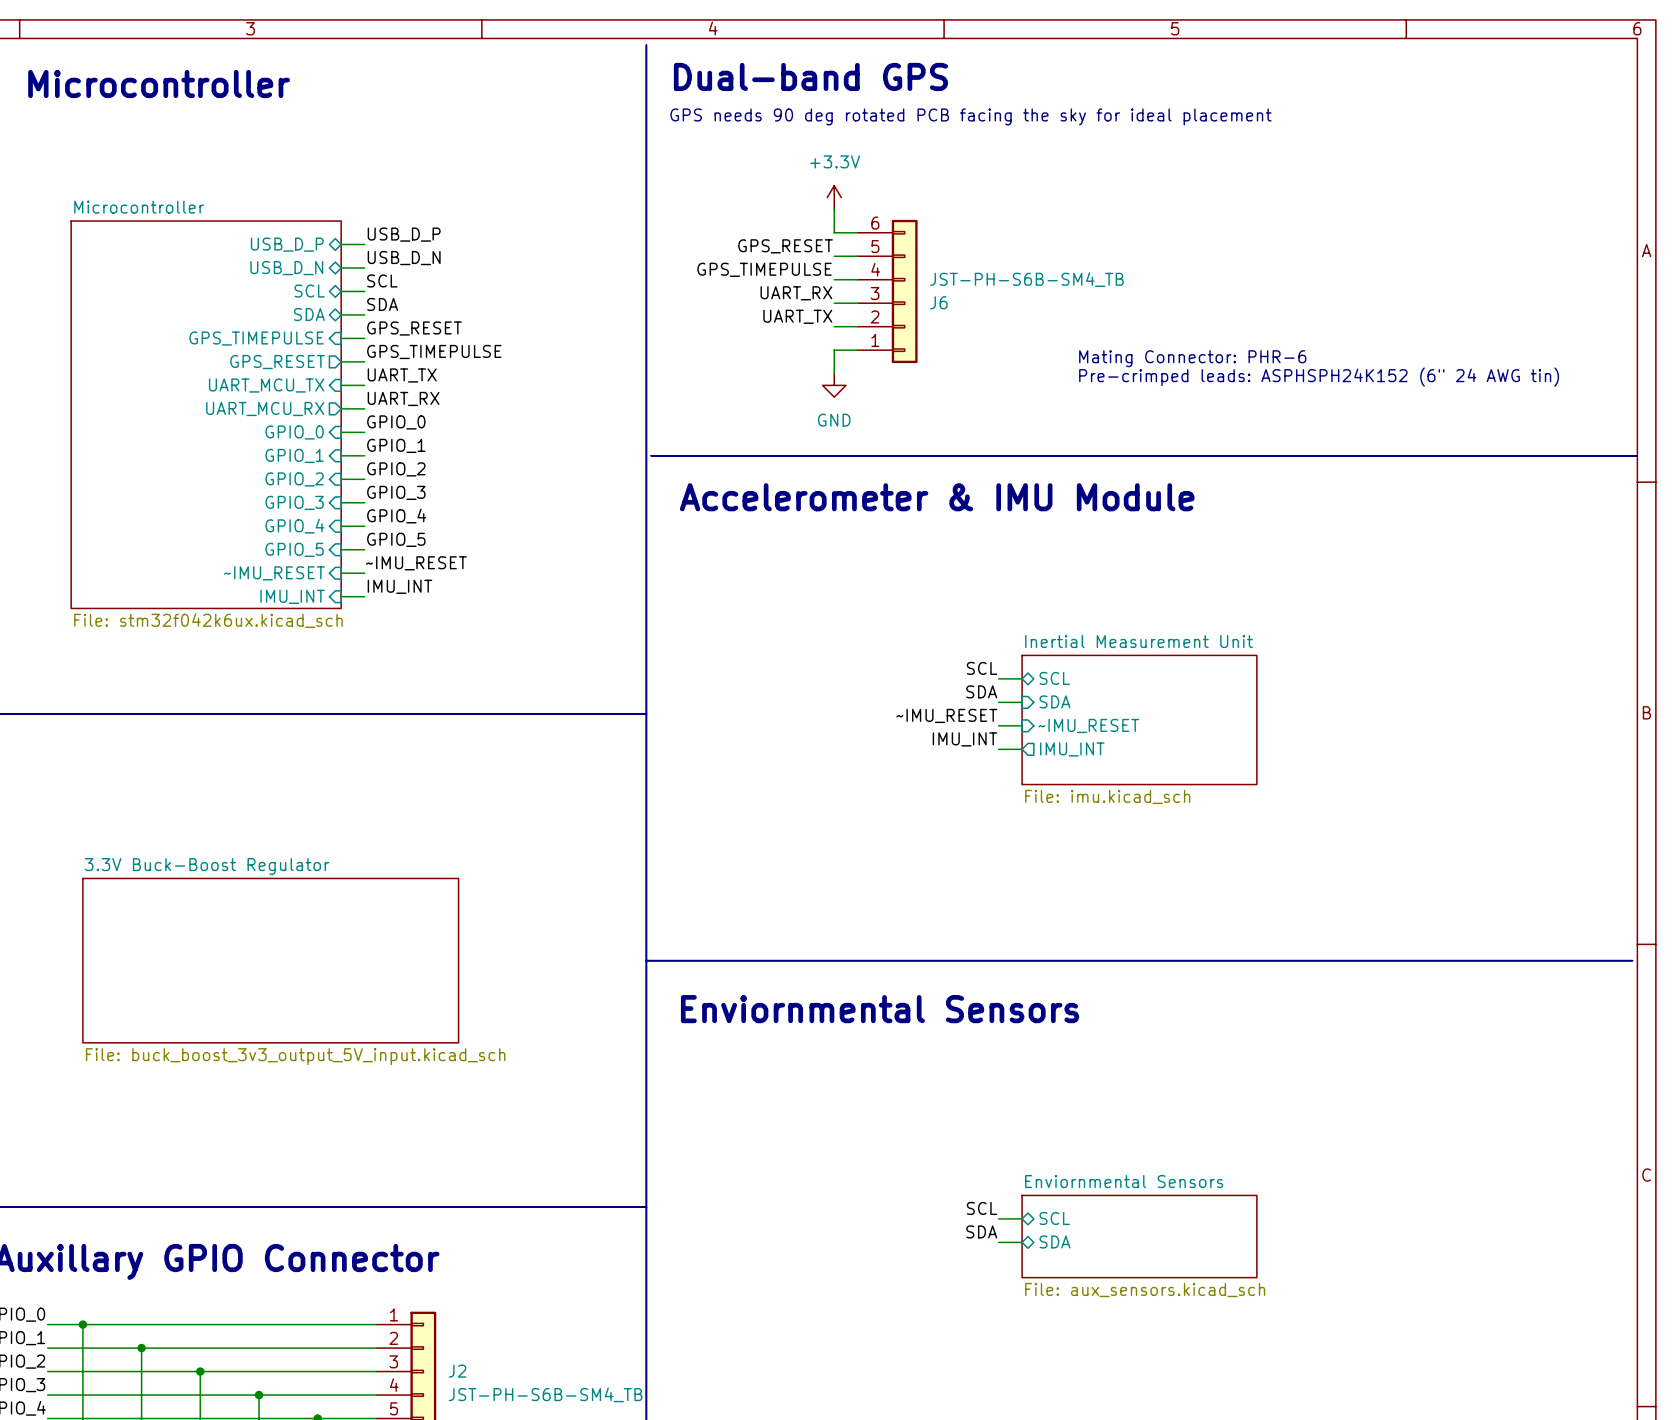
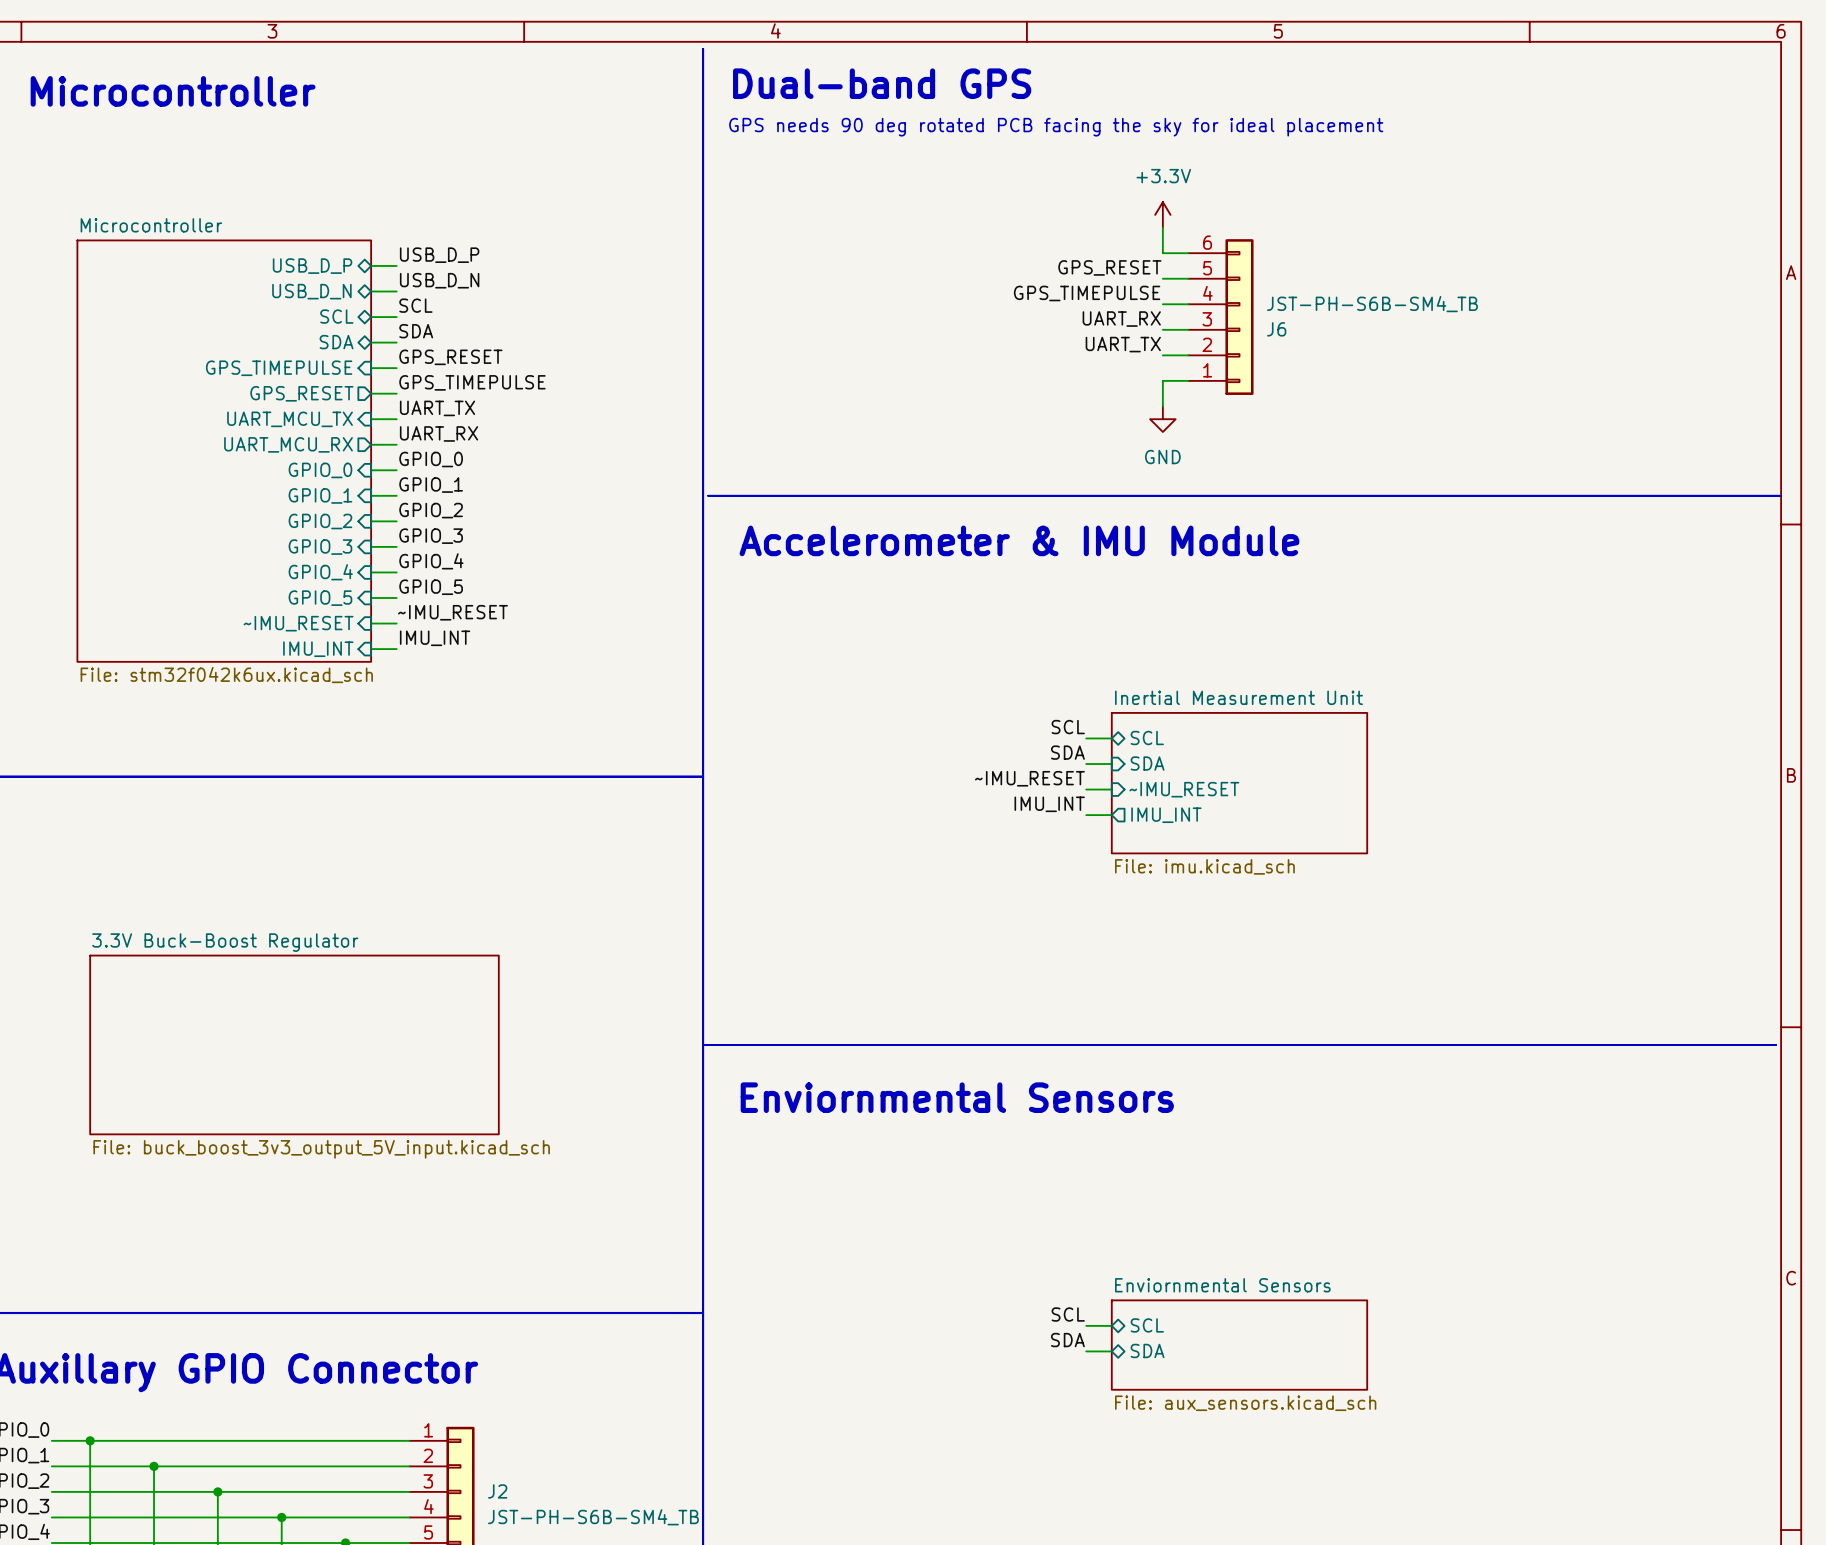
power symbol: +3.3V (834, 197) -> none
power symbol: none -> +3.3V (1162, 214)
wire: (834, 209) (834, 232) (857, 232) -> none
wire: none -> (1162, 227) (1162, 253) (1188, 253)
label: GPS_RESET (785, 246) -> none
label: none -> GPS_RESET (1109, 267)
wire: (834, 256) (857, 256) -> none
wire: none -> (1162, 278) (1188, 278)
label: GPS_TIMEPULSE (764, 269) -> none
label: none -> GPS_TIMEPULSE (1087, 293)
wire: (834, 279) (857, 279) -> none
wire: none -> (1162, 304) (1188, 304)
J6 position: (887, 291) -> (1220, 317)
label: UART_RX (796, 293) -> none
label: none -> UART_RX (1121, 319)
wire: (834, 303) (857, 303) -> none
wire: none -> (1162, 329) (1188, 329)
label: UART_TX (797, 316) -> none
label: none -> UART_TX (1123, 344)
wire: (834, 326) (857, 326) -> none
wire: none -> (1162, 355) (1188, 355)
wire: (857, 350) (834, 350) (834, 373) -> none
wire: none -> (1188, 380) (1162, 380) (1162, 406)
text: Mating Connector: PHR-6 (1192, 358) -> none
text: Pre-crimped leads: ASPHSPH24K152 (6" 24 AWG tin) (1319, 377) -> none
power symbol: GND (834, 385) -> none
power symbol: none -> GND (1162, 419)

